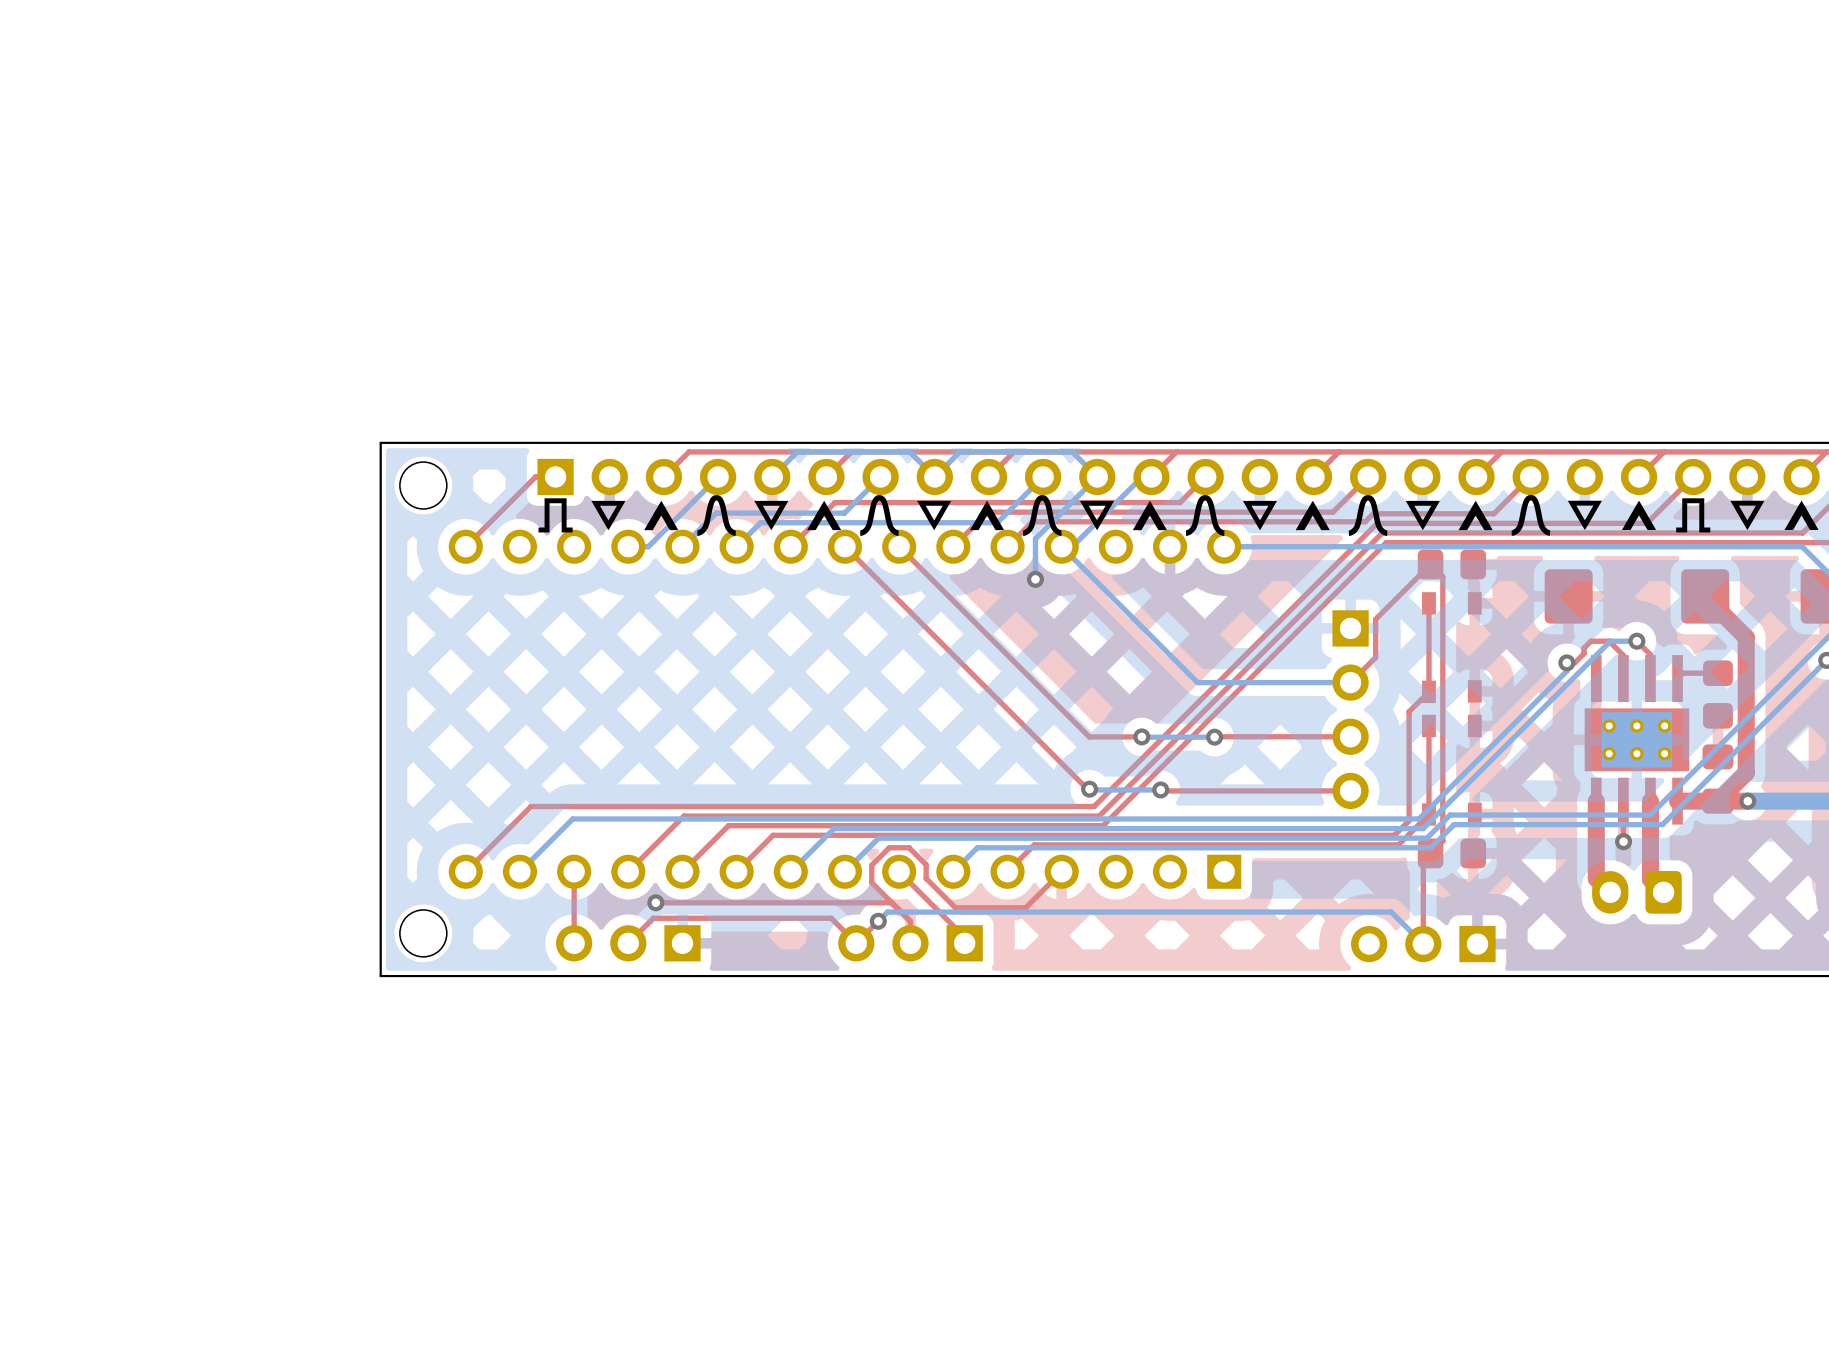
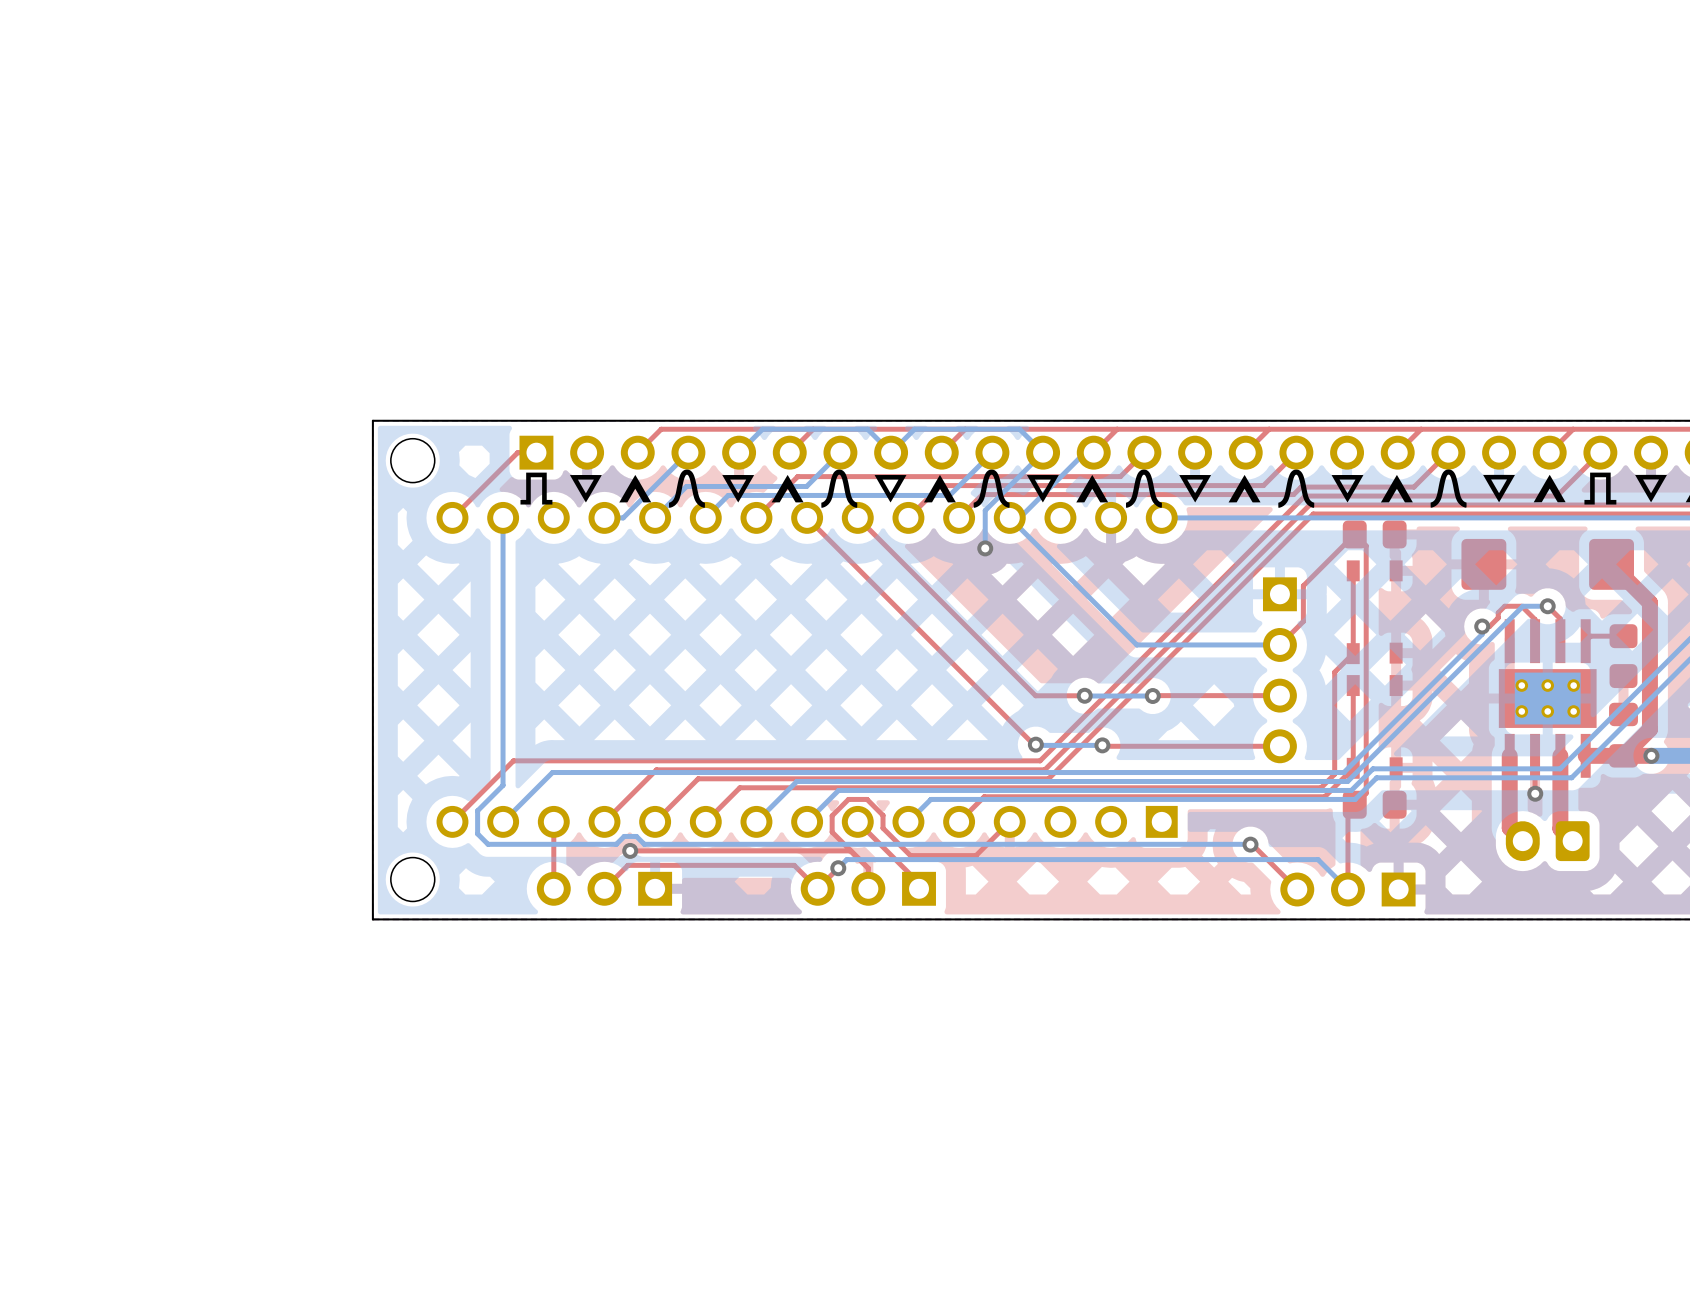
bottom track: none -> (503, 518) (503, 785) (477, 810) (477, 833) (488, 844) (616, 844) (624, 836) (636, 836) (644, 844) (1250, 844)
top track: none -> (1250, 844) (1297, 889)
via: none -> (1250, 844)

